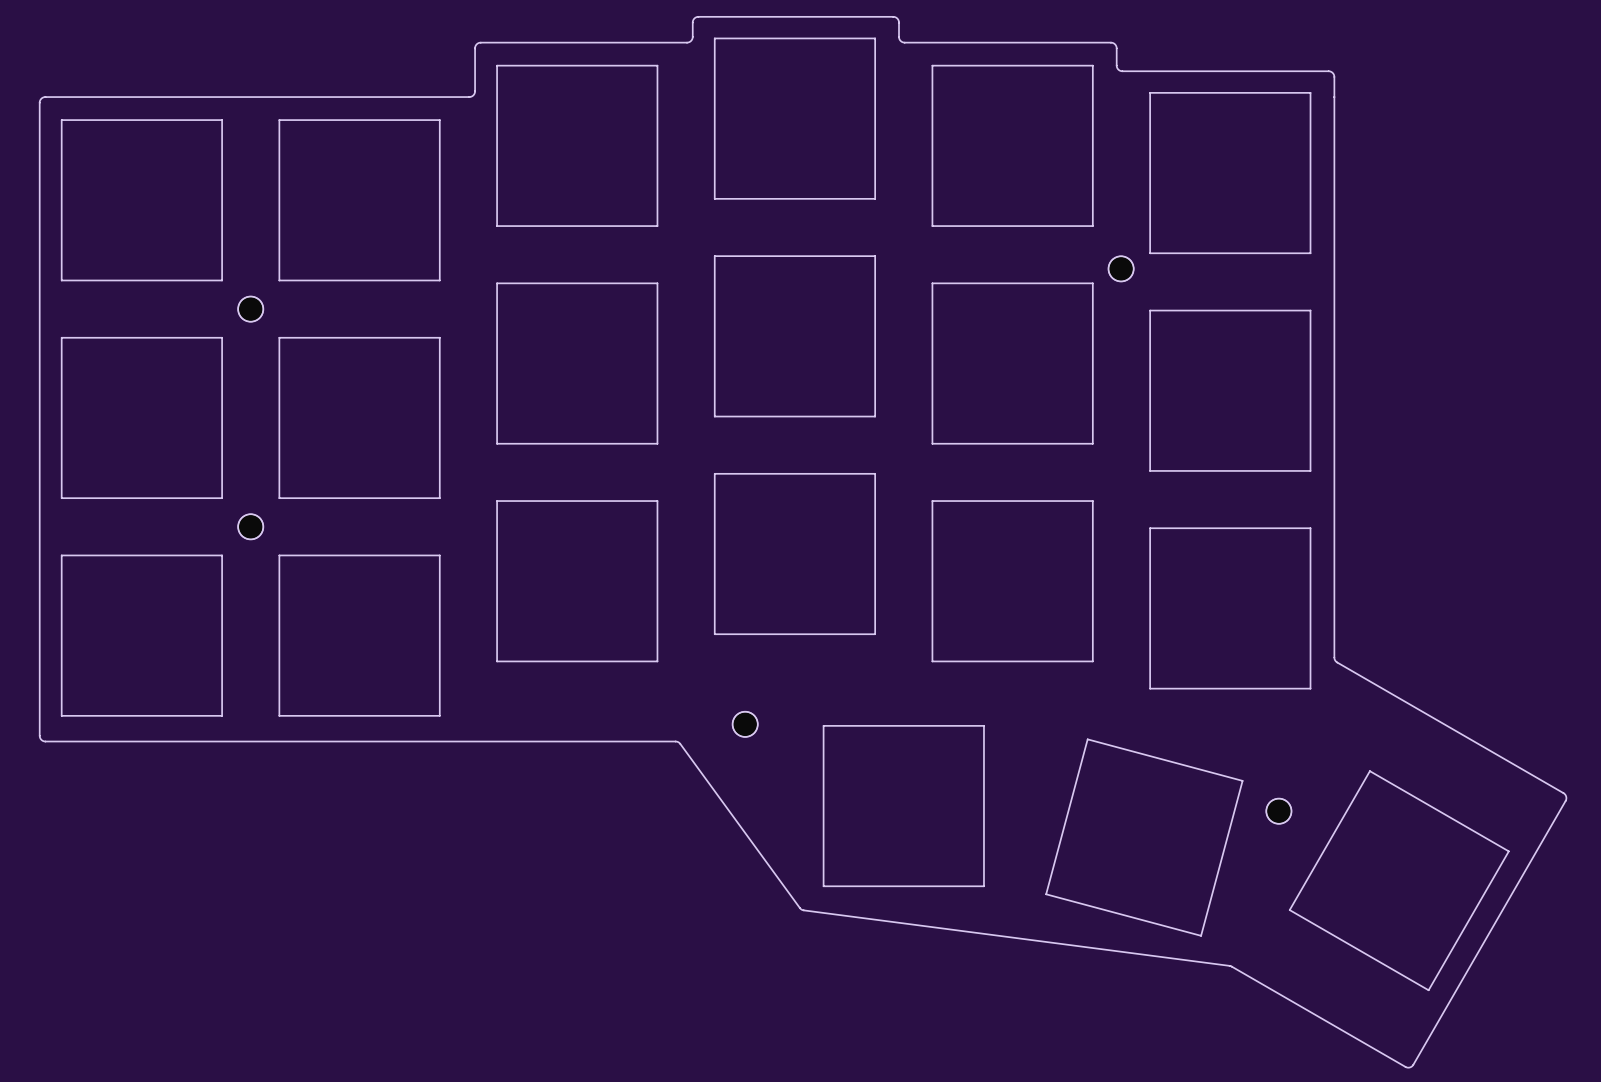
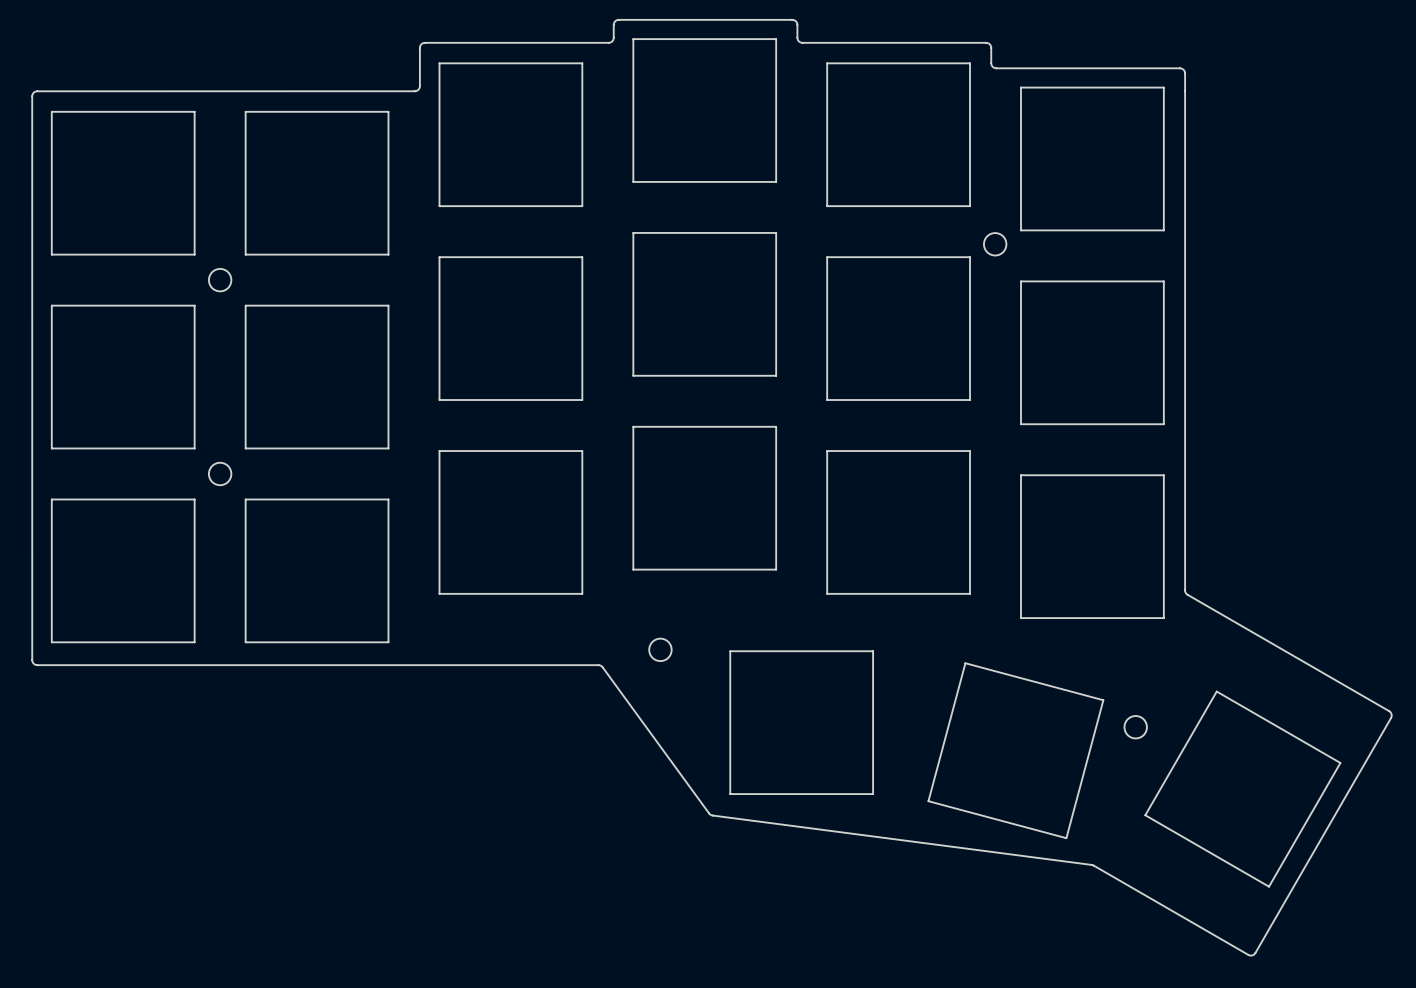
part: (1121, 268) -> none
part: (250, 309) -> none
part: (250, 526) -> none
part: (745, 724) -> none
part: (1278, 811) -> none

